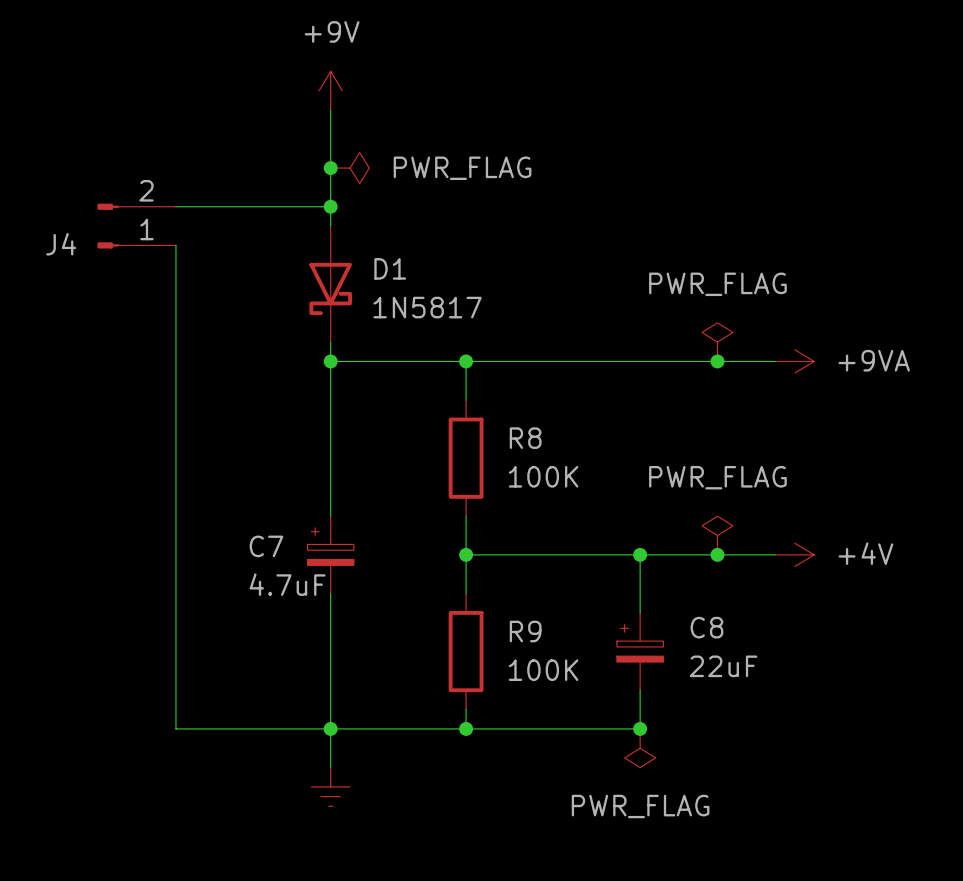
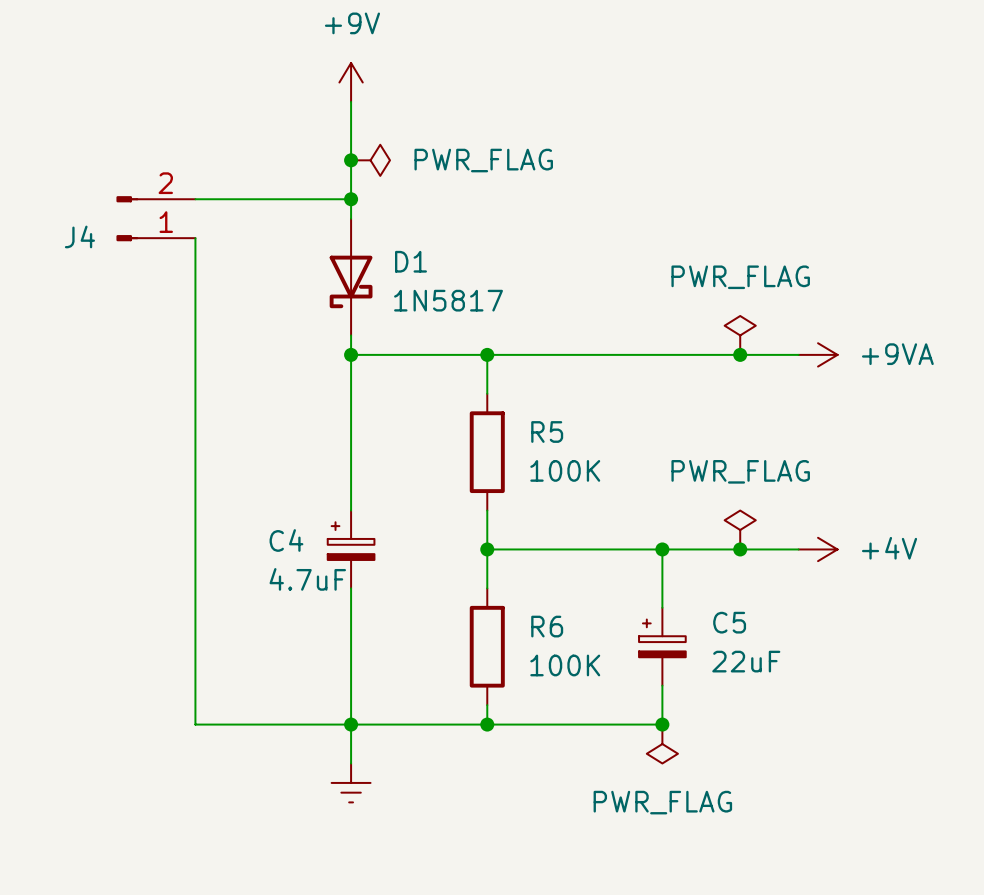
R8 name: R8 (525, 438) -> R5 (547, 431)
C7 name: C7 (266, 546) -> C4 (286, 540)
C8 name: C8 (706, 627) -> C5 (729, 622)
R9 name: R9 (525, 631) -> R6 (547, 626)

